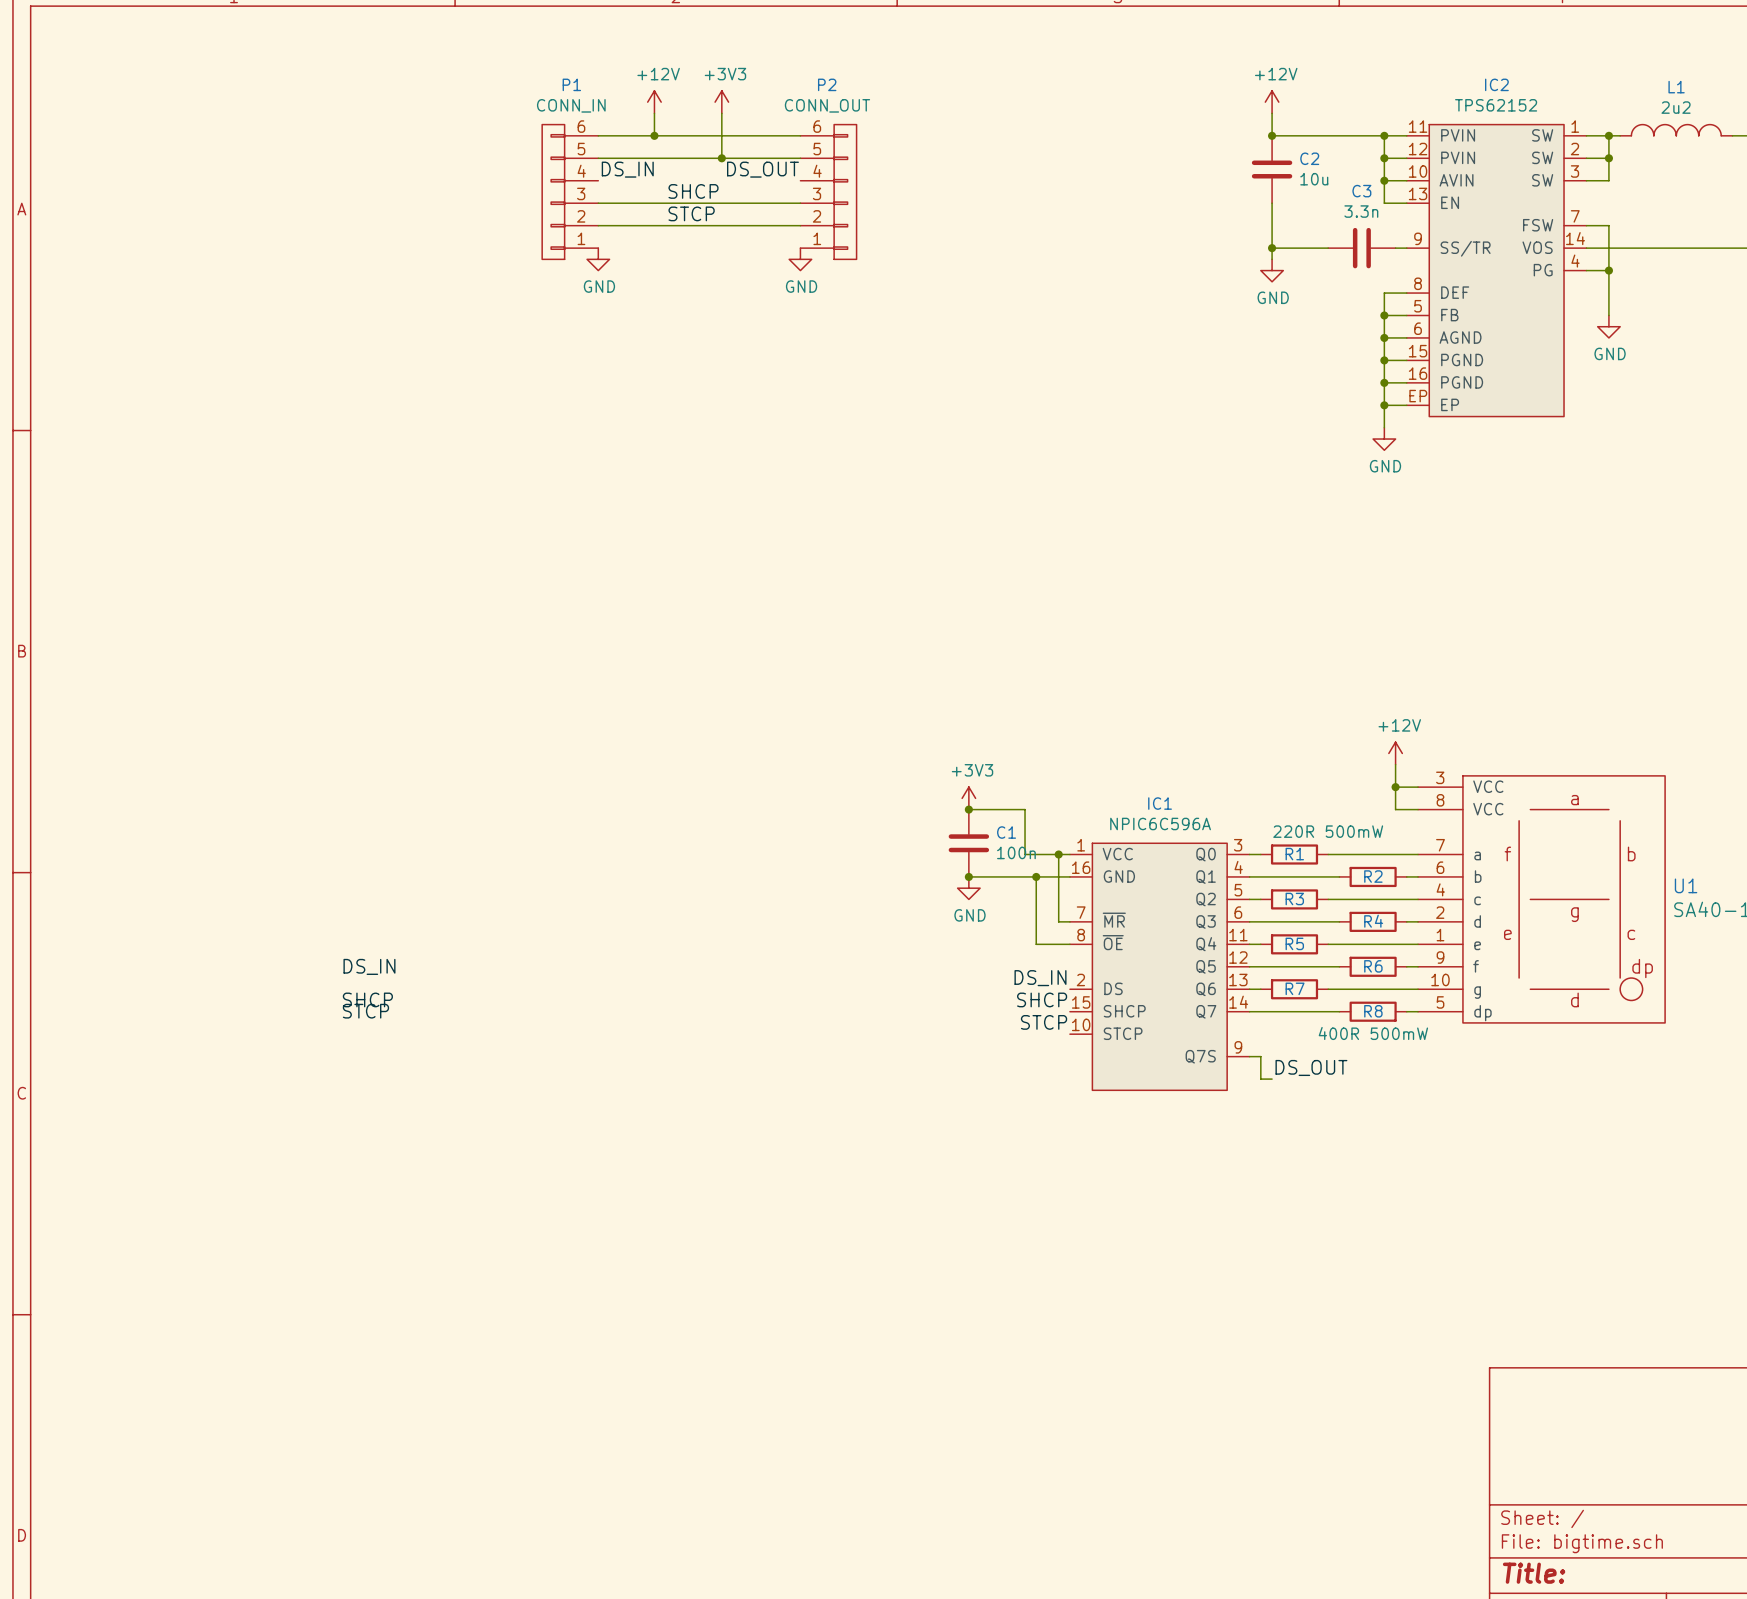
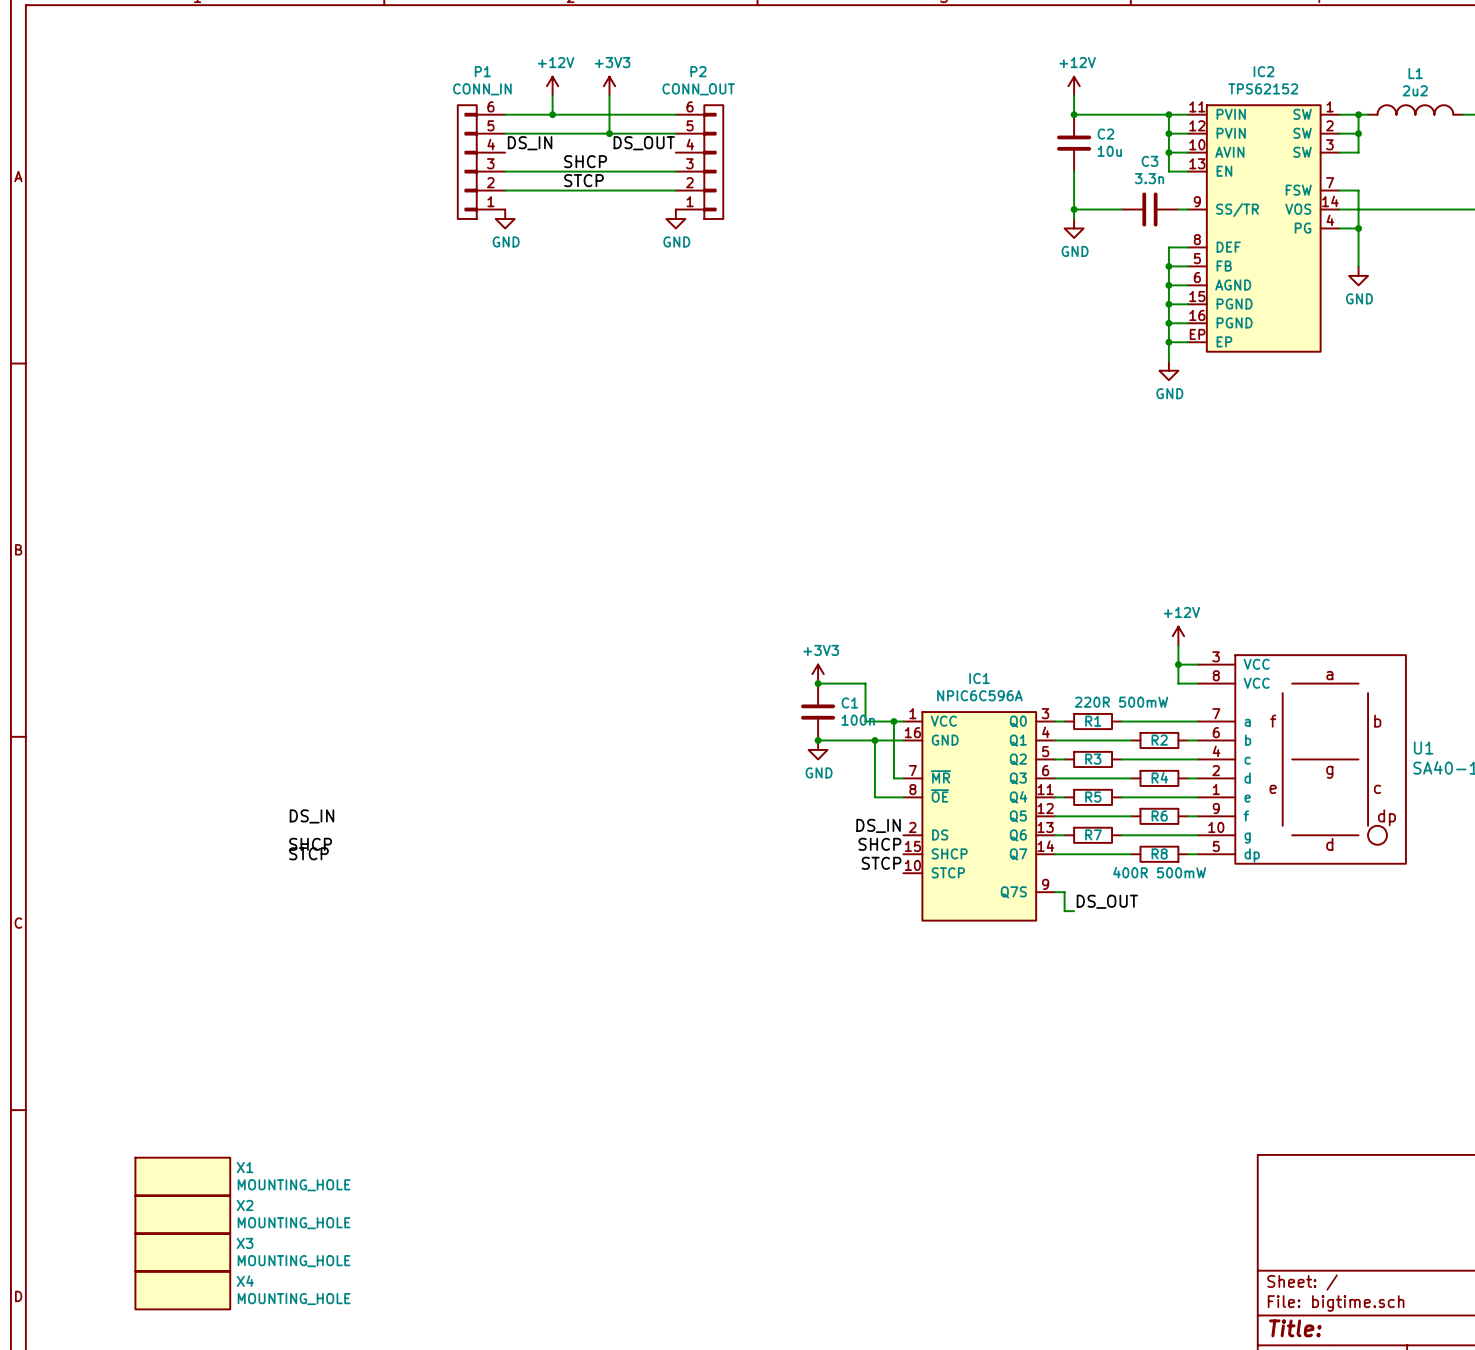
X1: none -> MOUNTING_HOLE (182, 1176)
X2: none -> MOUNTING_HOLE (182, 1214)
X3: none -> MOUNTING_HOLE (182, 1252)
X4: none -> MOUNTING_HOLE (182, 1290)

